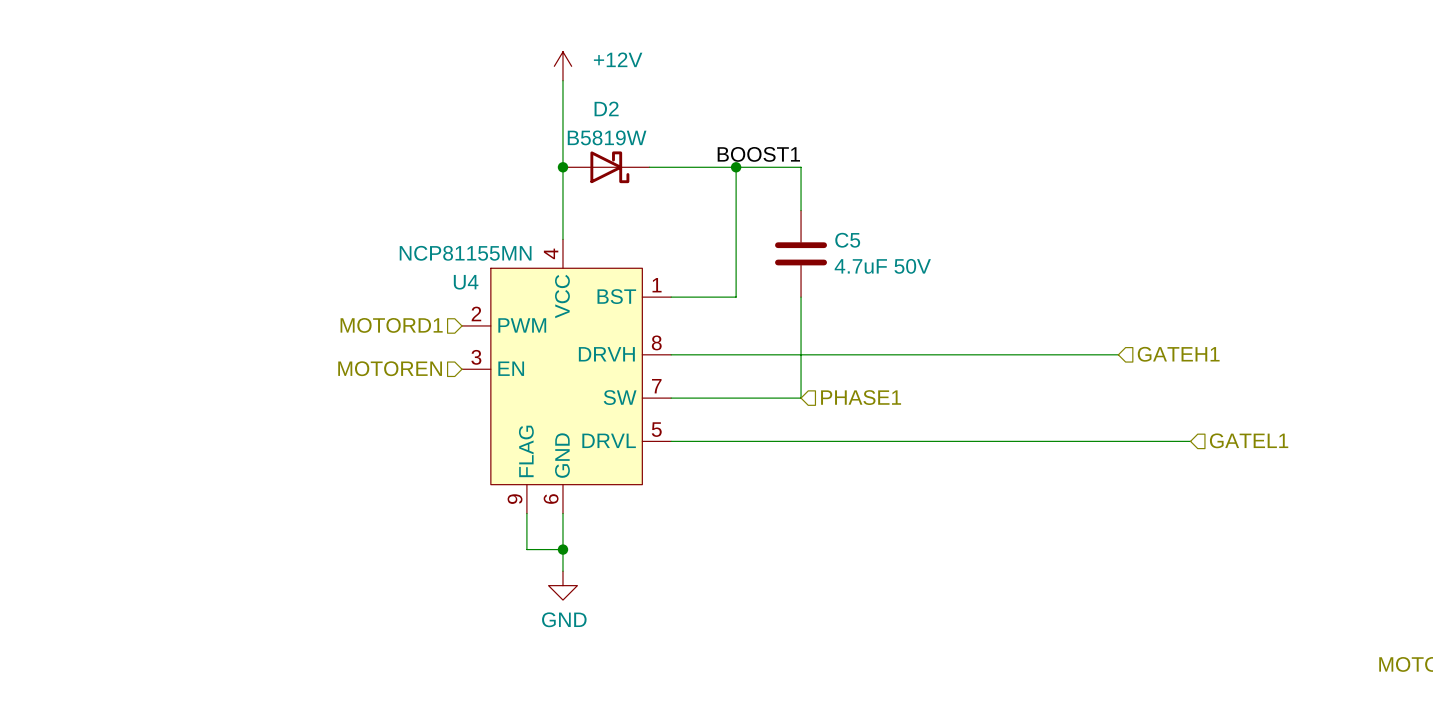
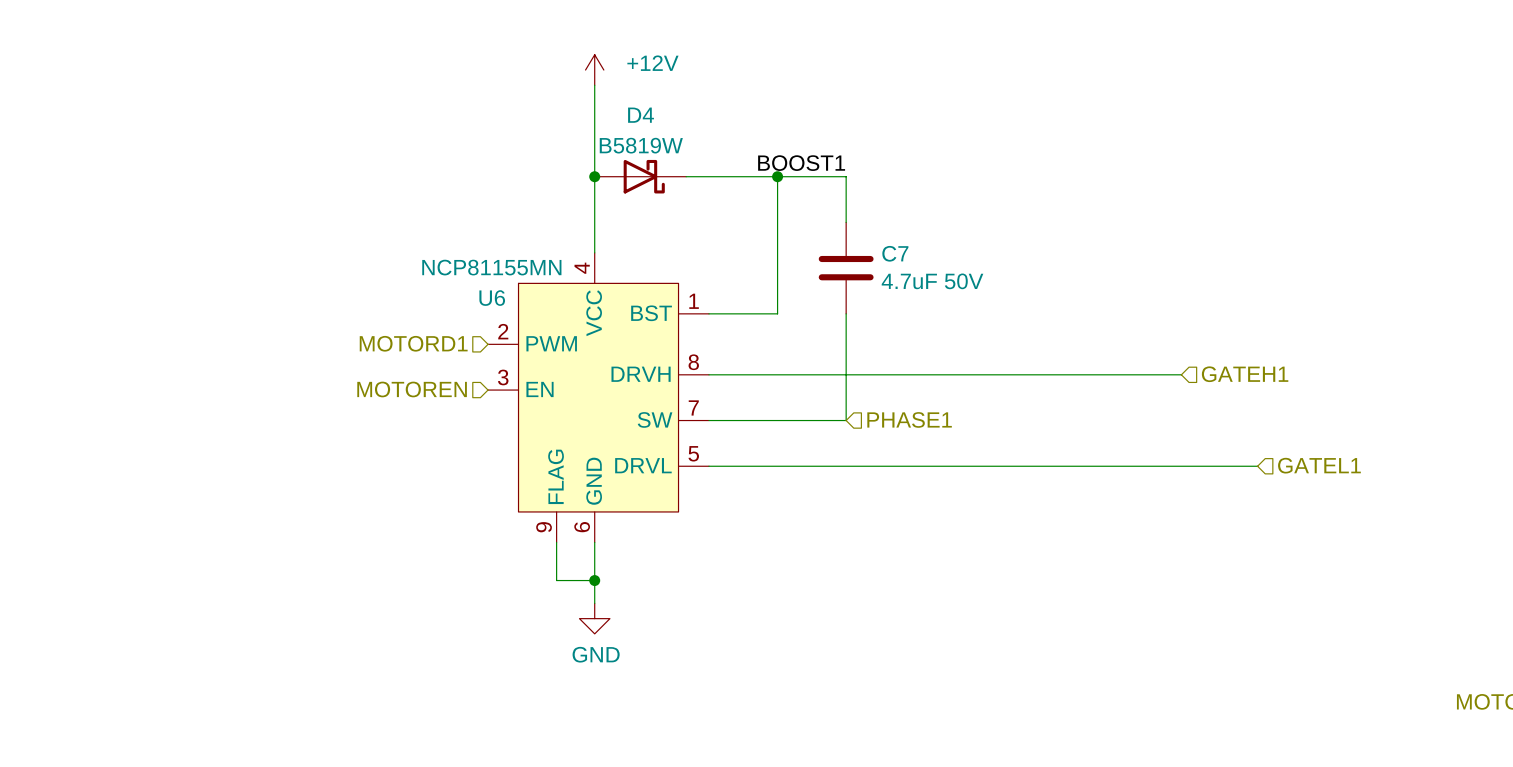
D2 name: D2 (606, 108) -> D4 (641, 115)
C5 name: C5 (847, 240) -> C7 (895, 253)
U4 name: U4 (466, 282) -> U6 (492, 298)

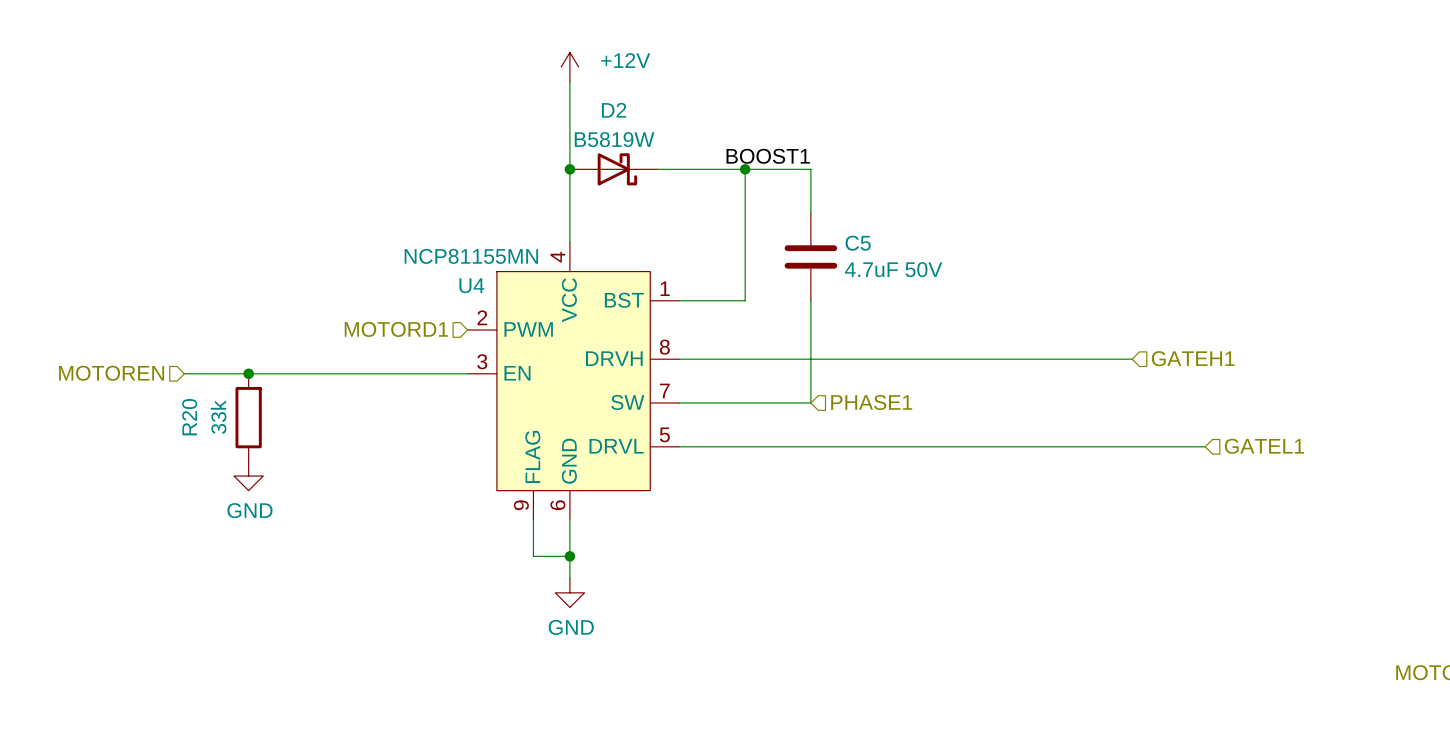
D4 name: D4 (641, 115) -> D2 (614, 110)
C7 name: C7 (895, 253) -> C5 (858, 243)
U6 name: U6 (492, 298) -> U4 (471, 285)
hierarchical label position: MOTOREN (412, 389) -> MOTOREN (111, 373)
wire: none -> (184, 373) (467, 373)
junction: none -> (248, 373)
R20: none -> 33k (248, 417)
power symbol: none -> GND (248, 476)

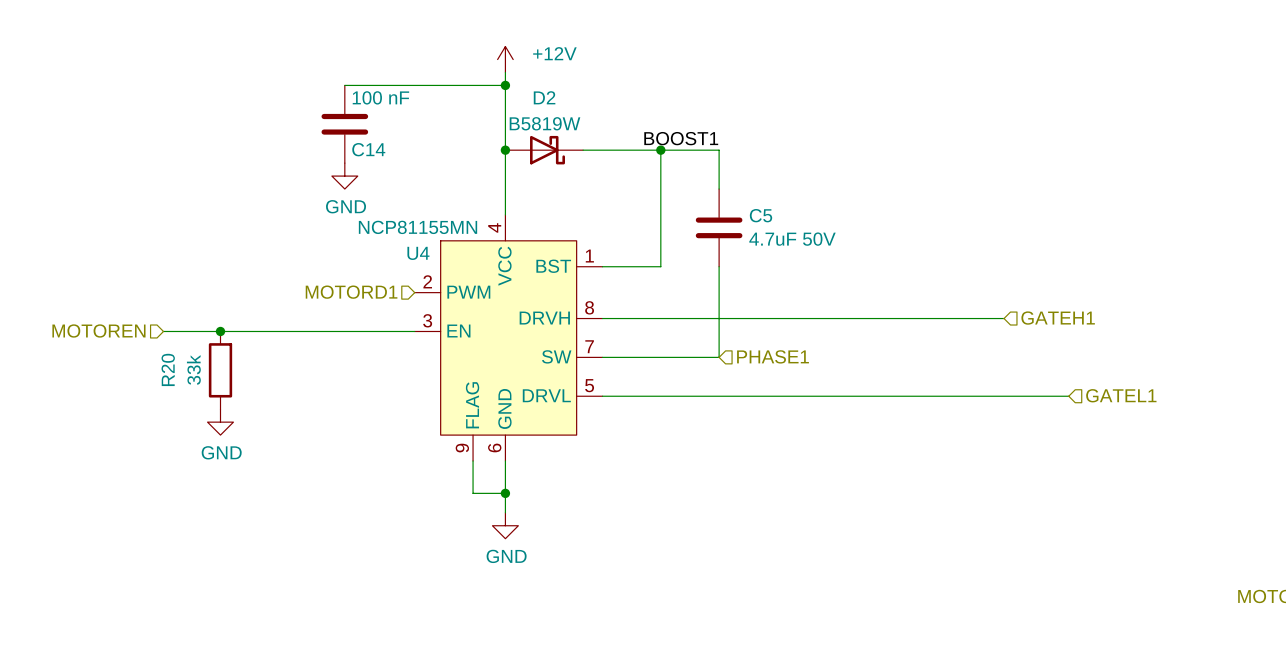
wire: none -> (344, 85) (505, 85)
junction: none -> (505, 85)
C14: none -> 100 nF (344, 124)
power symbol: none -> GND (344, 176)

